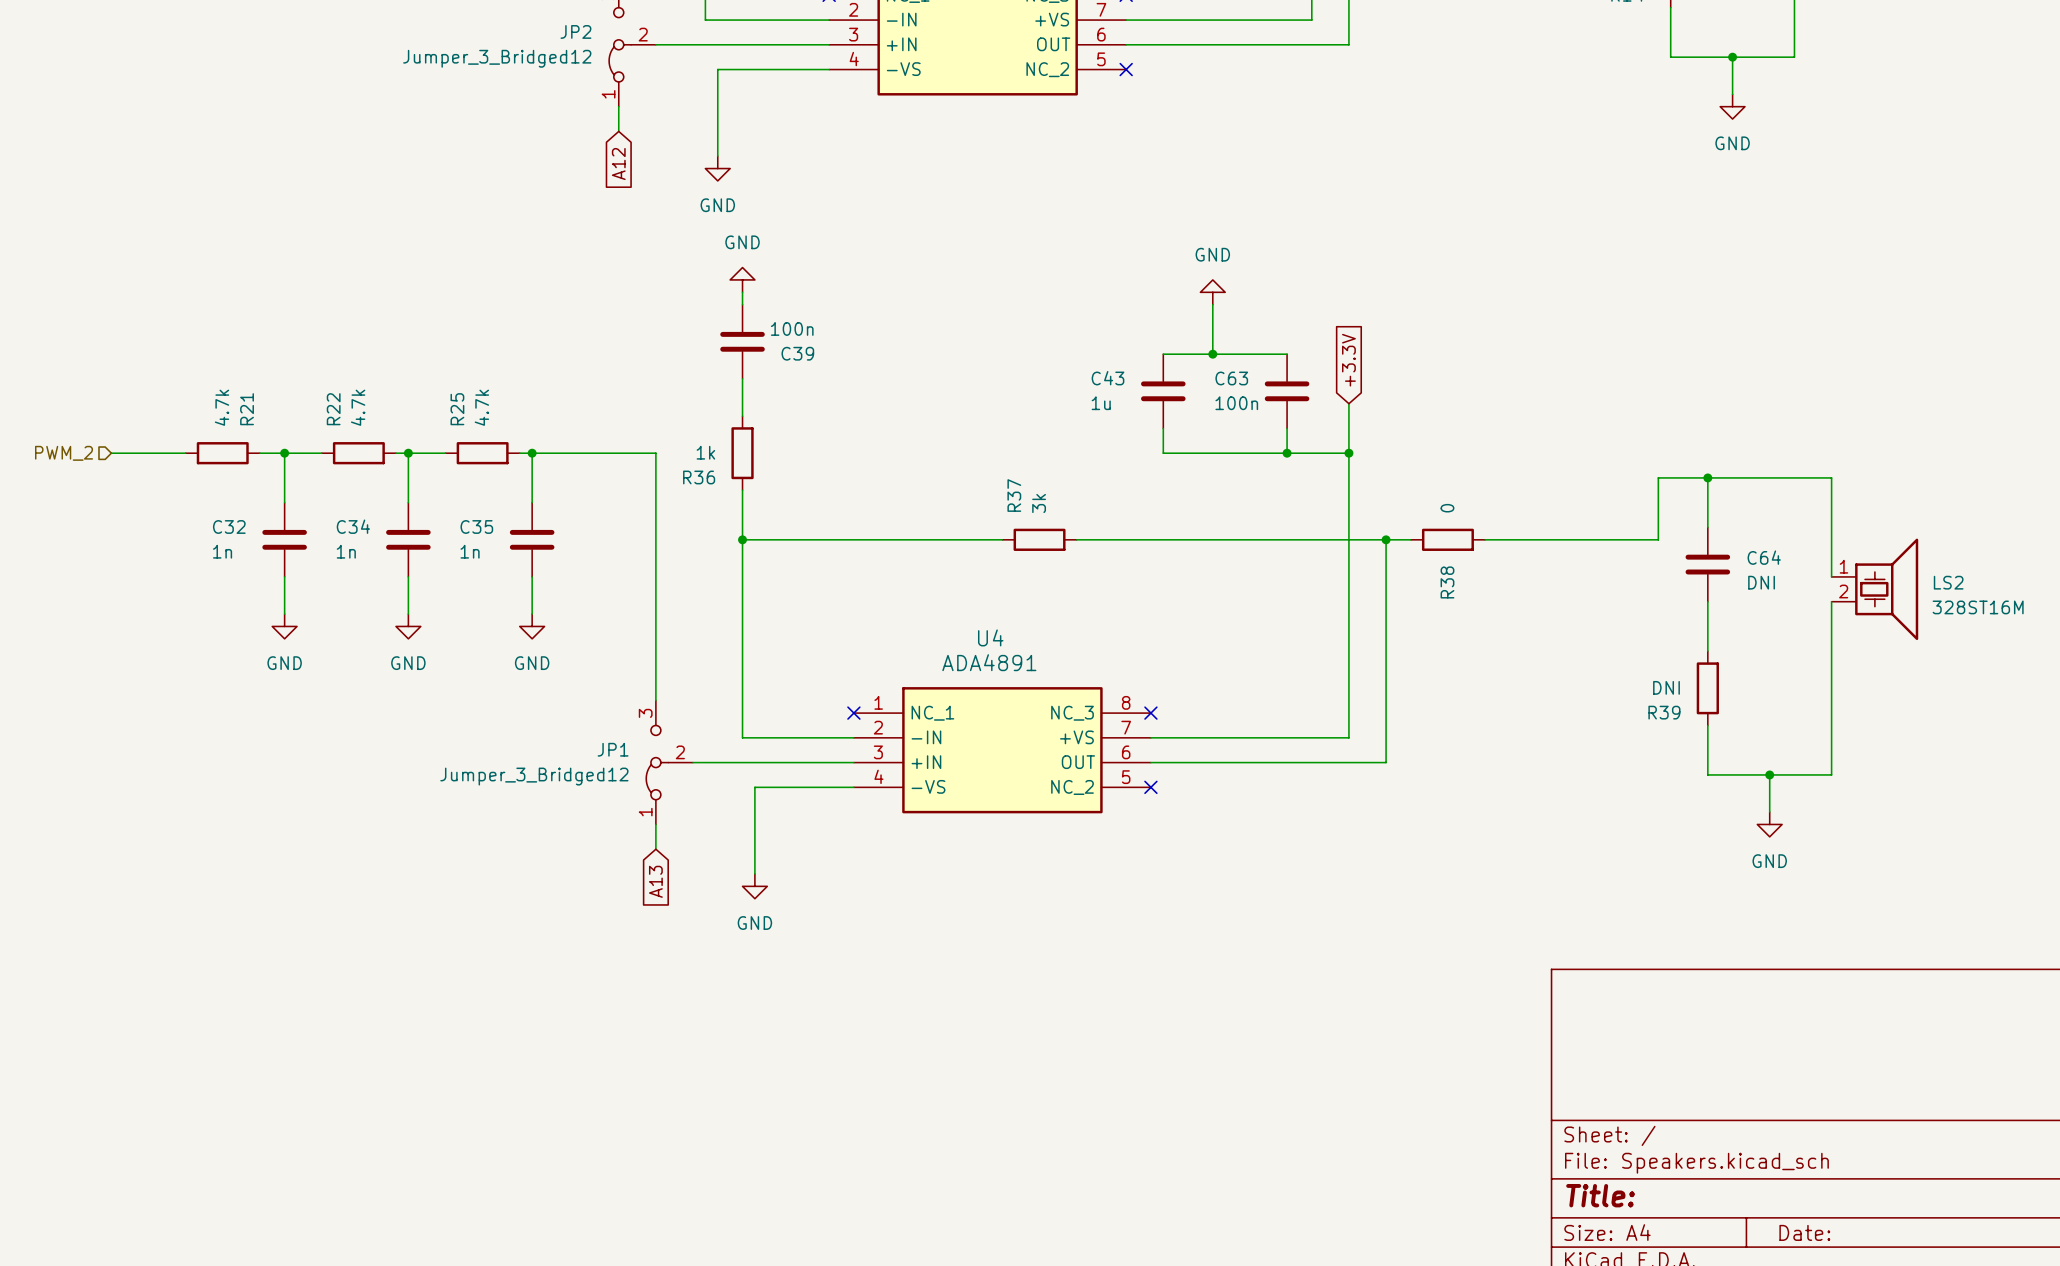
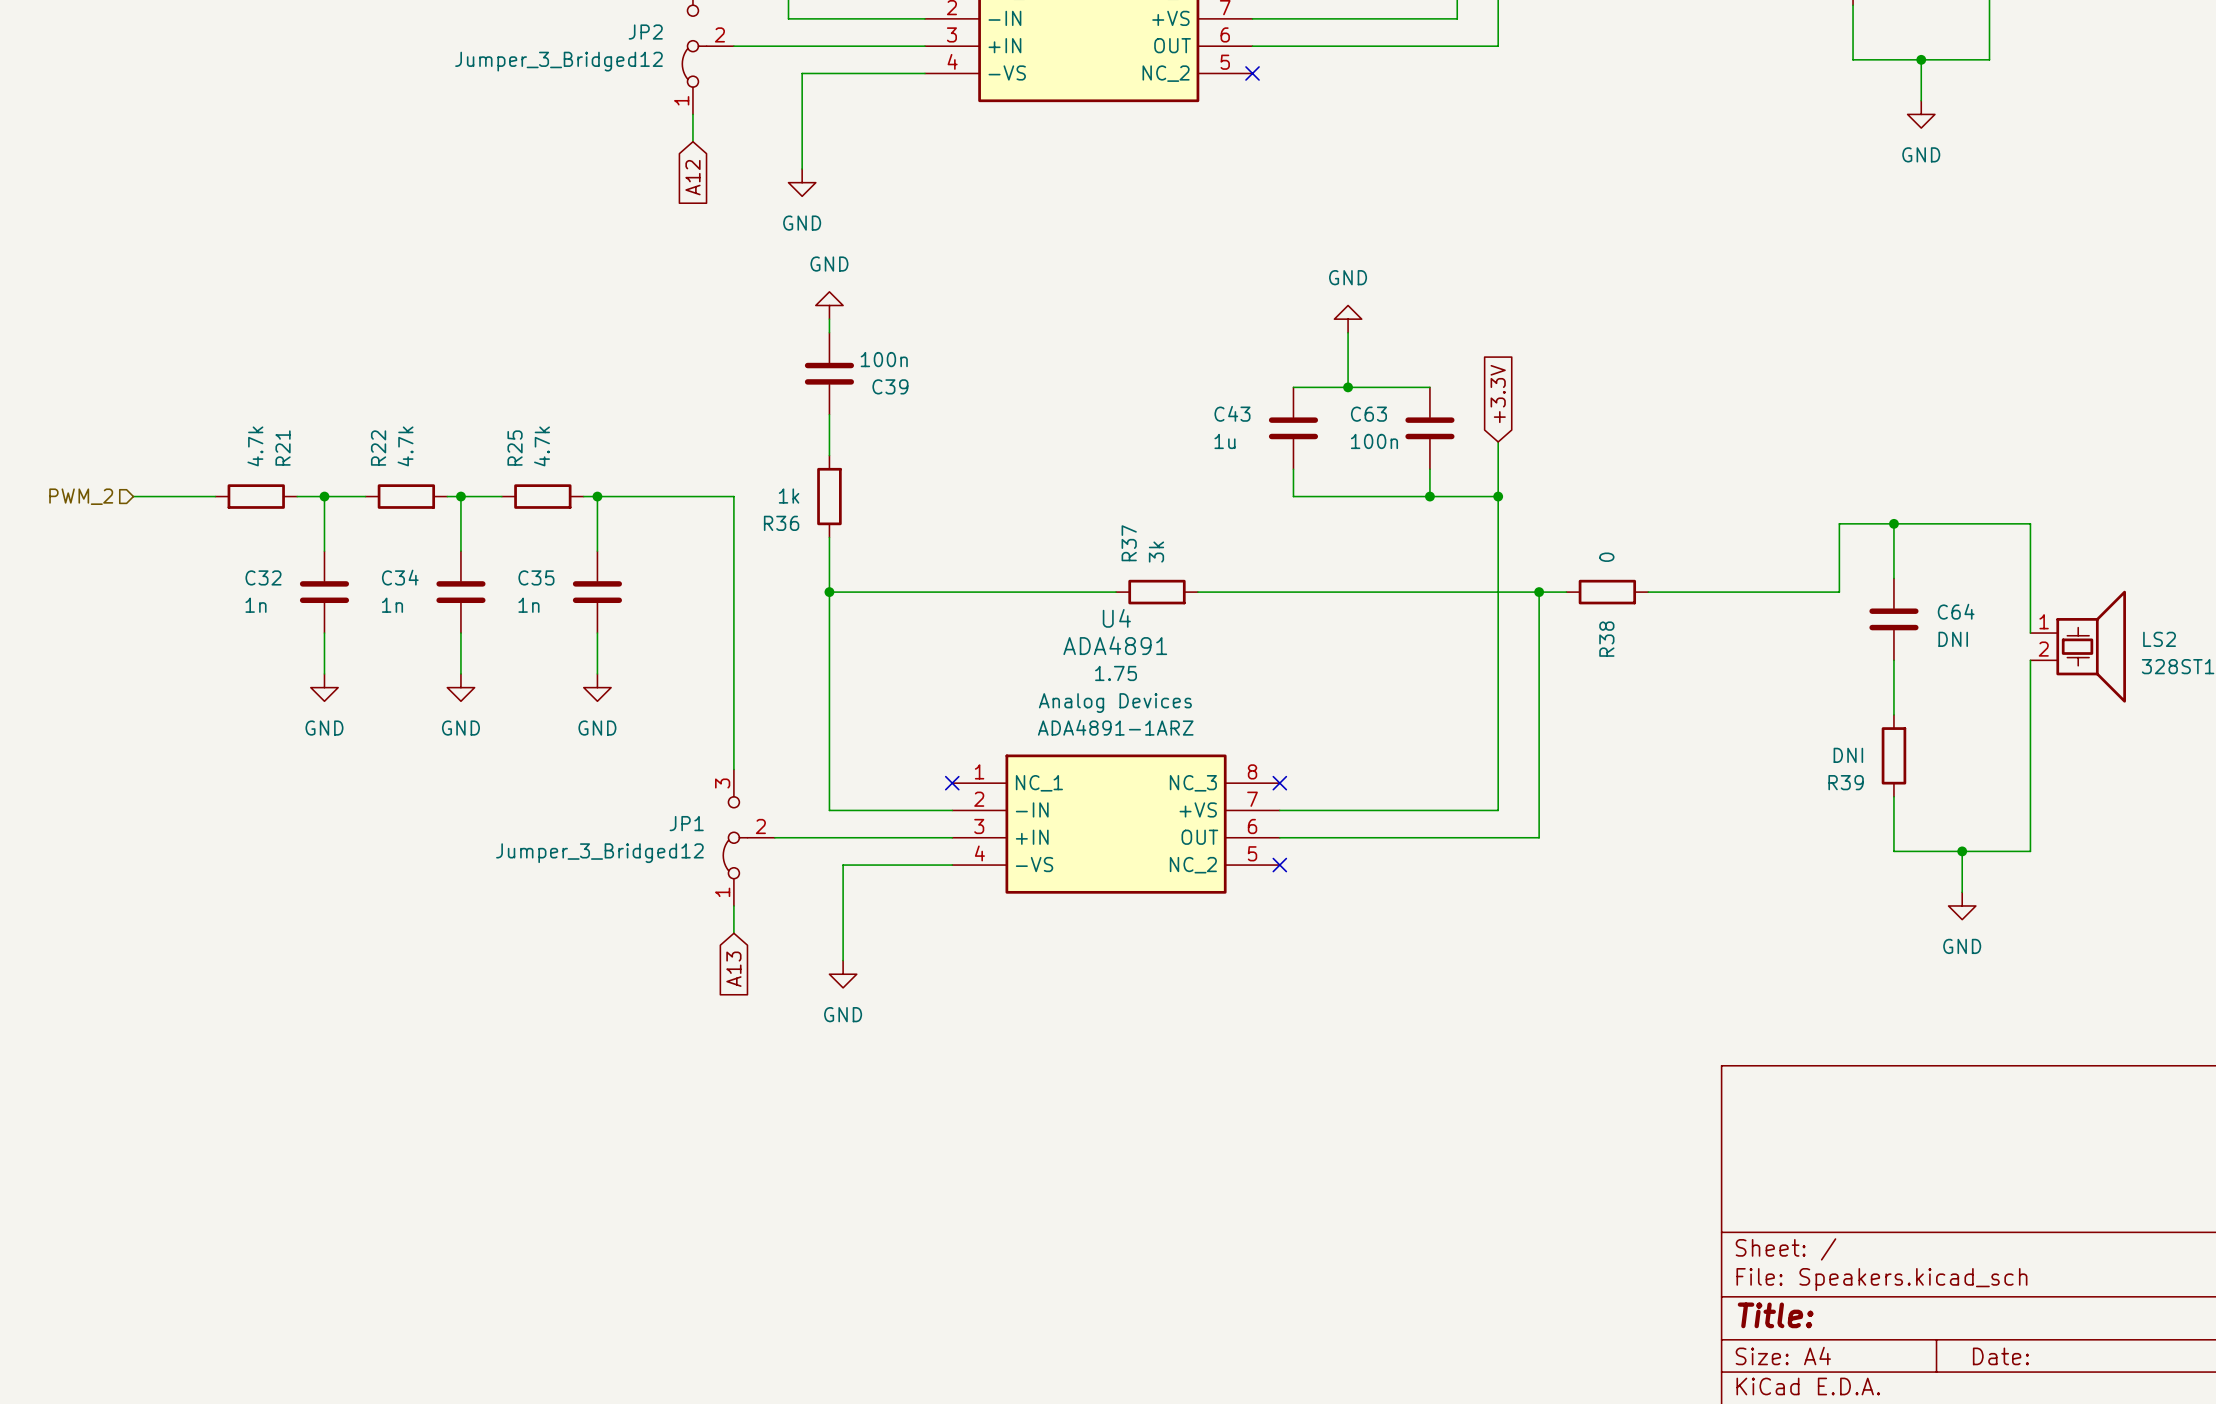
U4 text: none -> 1.75 (1116, 673)
U4 name position: U4 (990, 637) -> U4 (1116, 618)
U4 text: none -> Analog Devices (1115, 703)
U4 value position: ADA4891 (989, 662) -> ADA4891 (1115, 645)
U4 text: none -> ADA4891-1ARZ (1115, 727)

